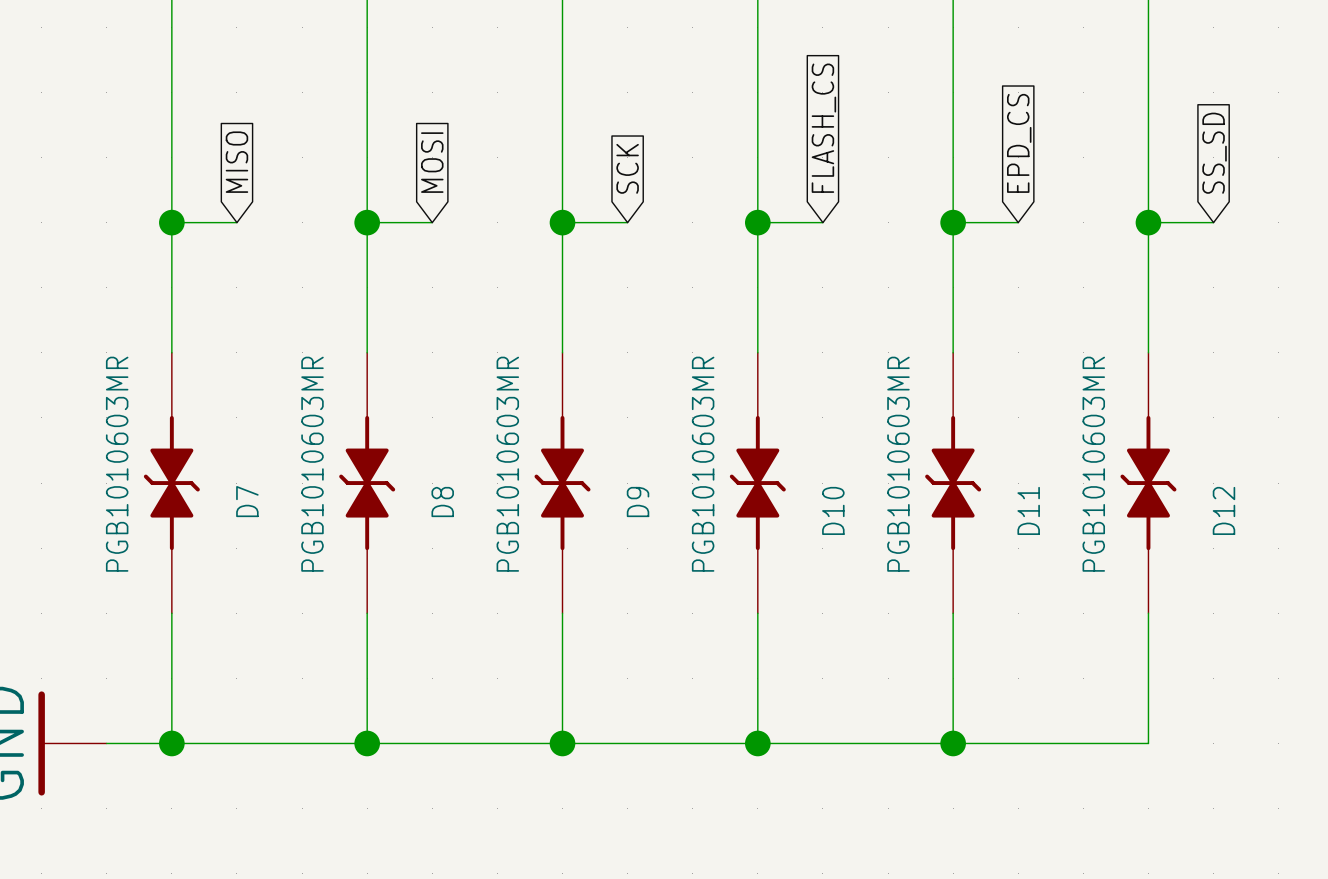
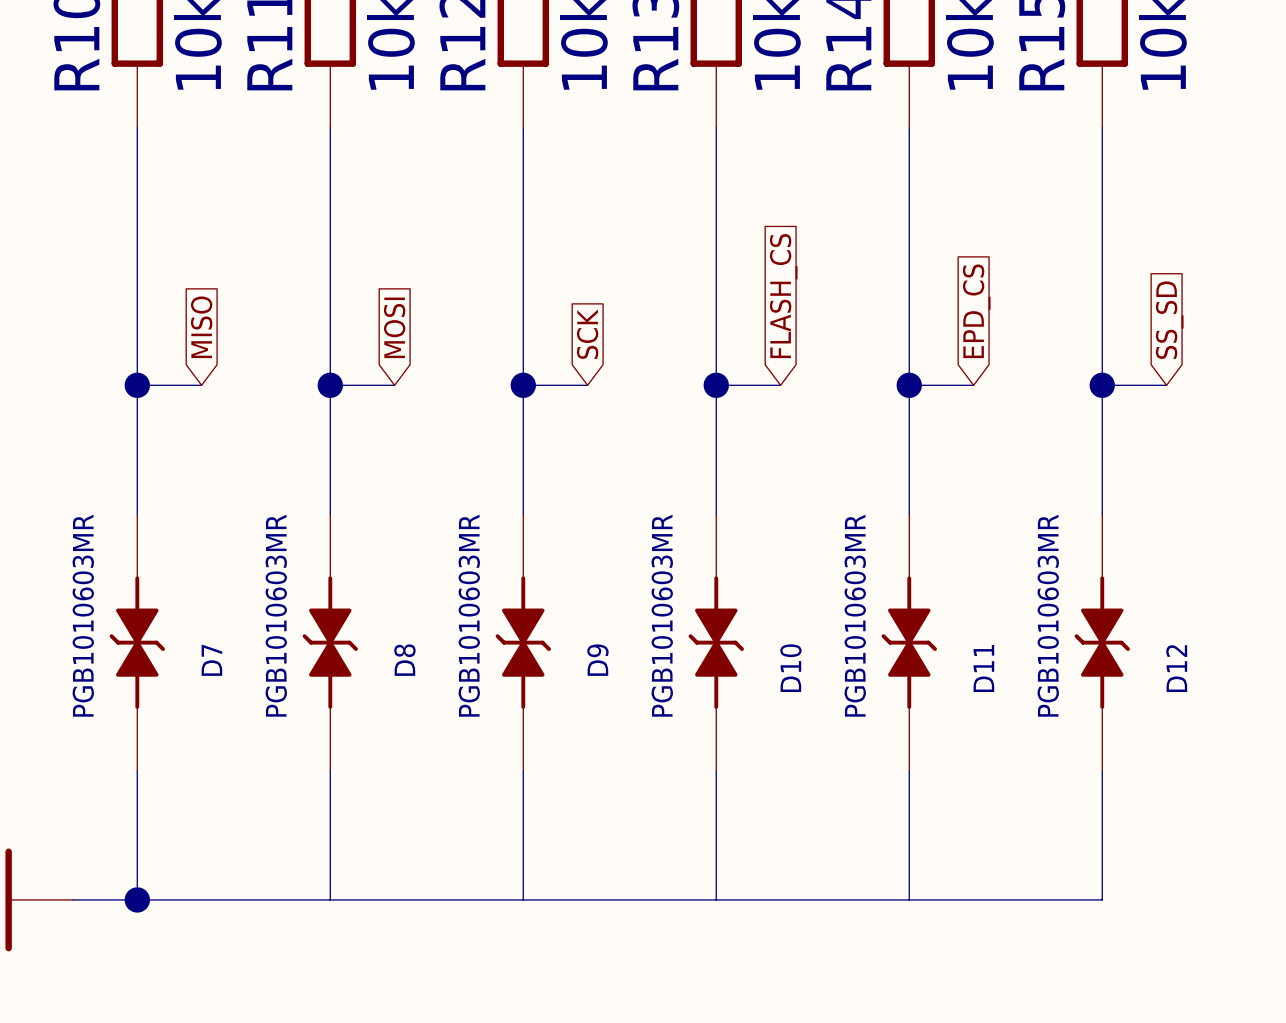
junction: (367, 743) -> none
junction: (562, 743) -> none
junction: (757, 743) -> none
junction: (953, 743) -> none

